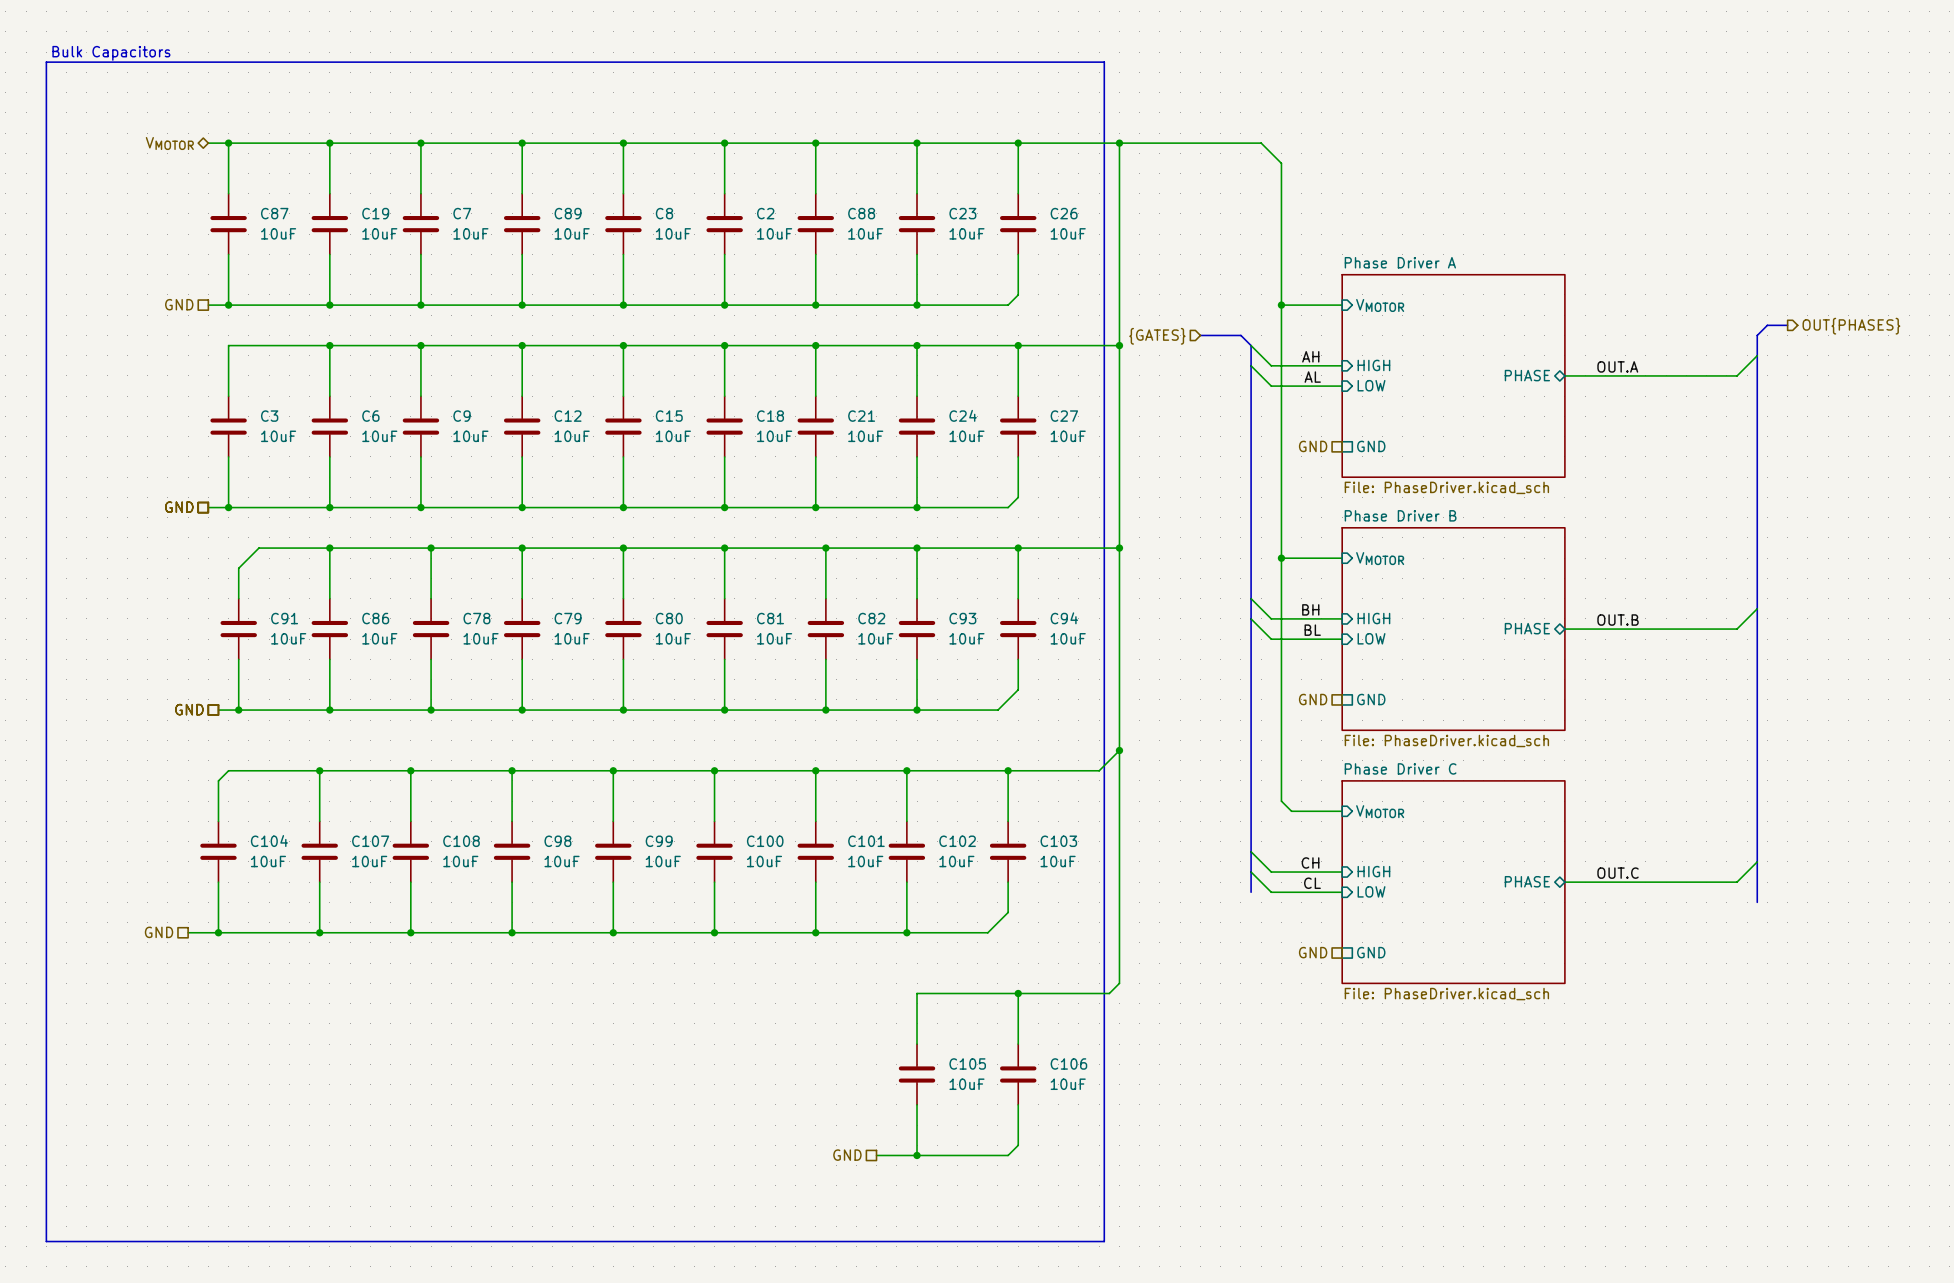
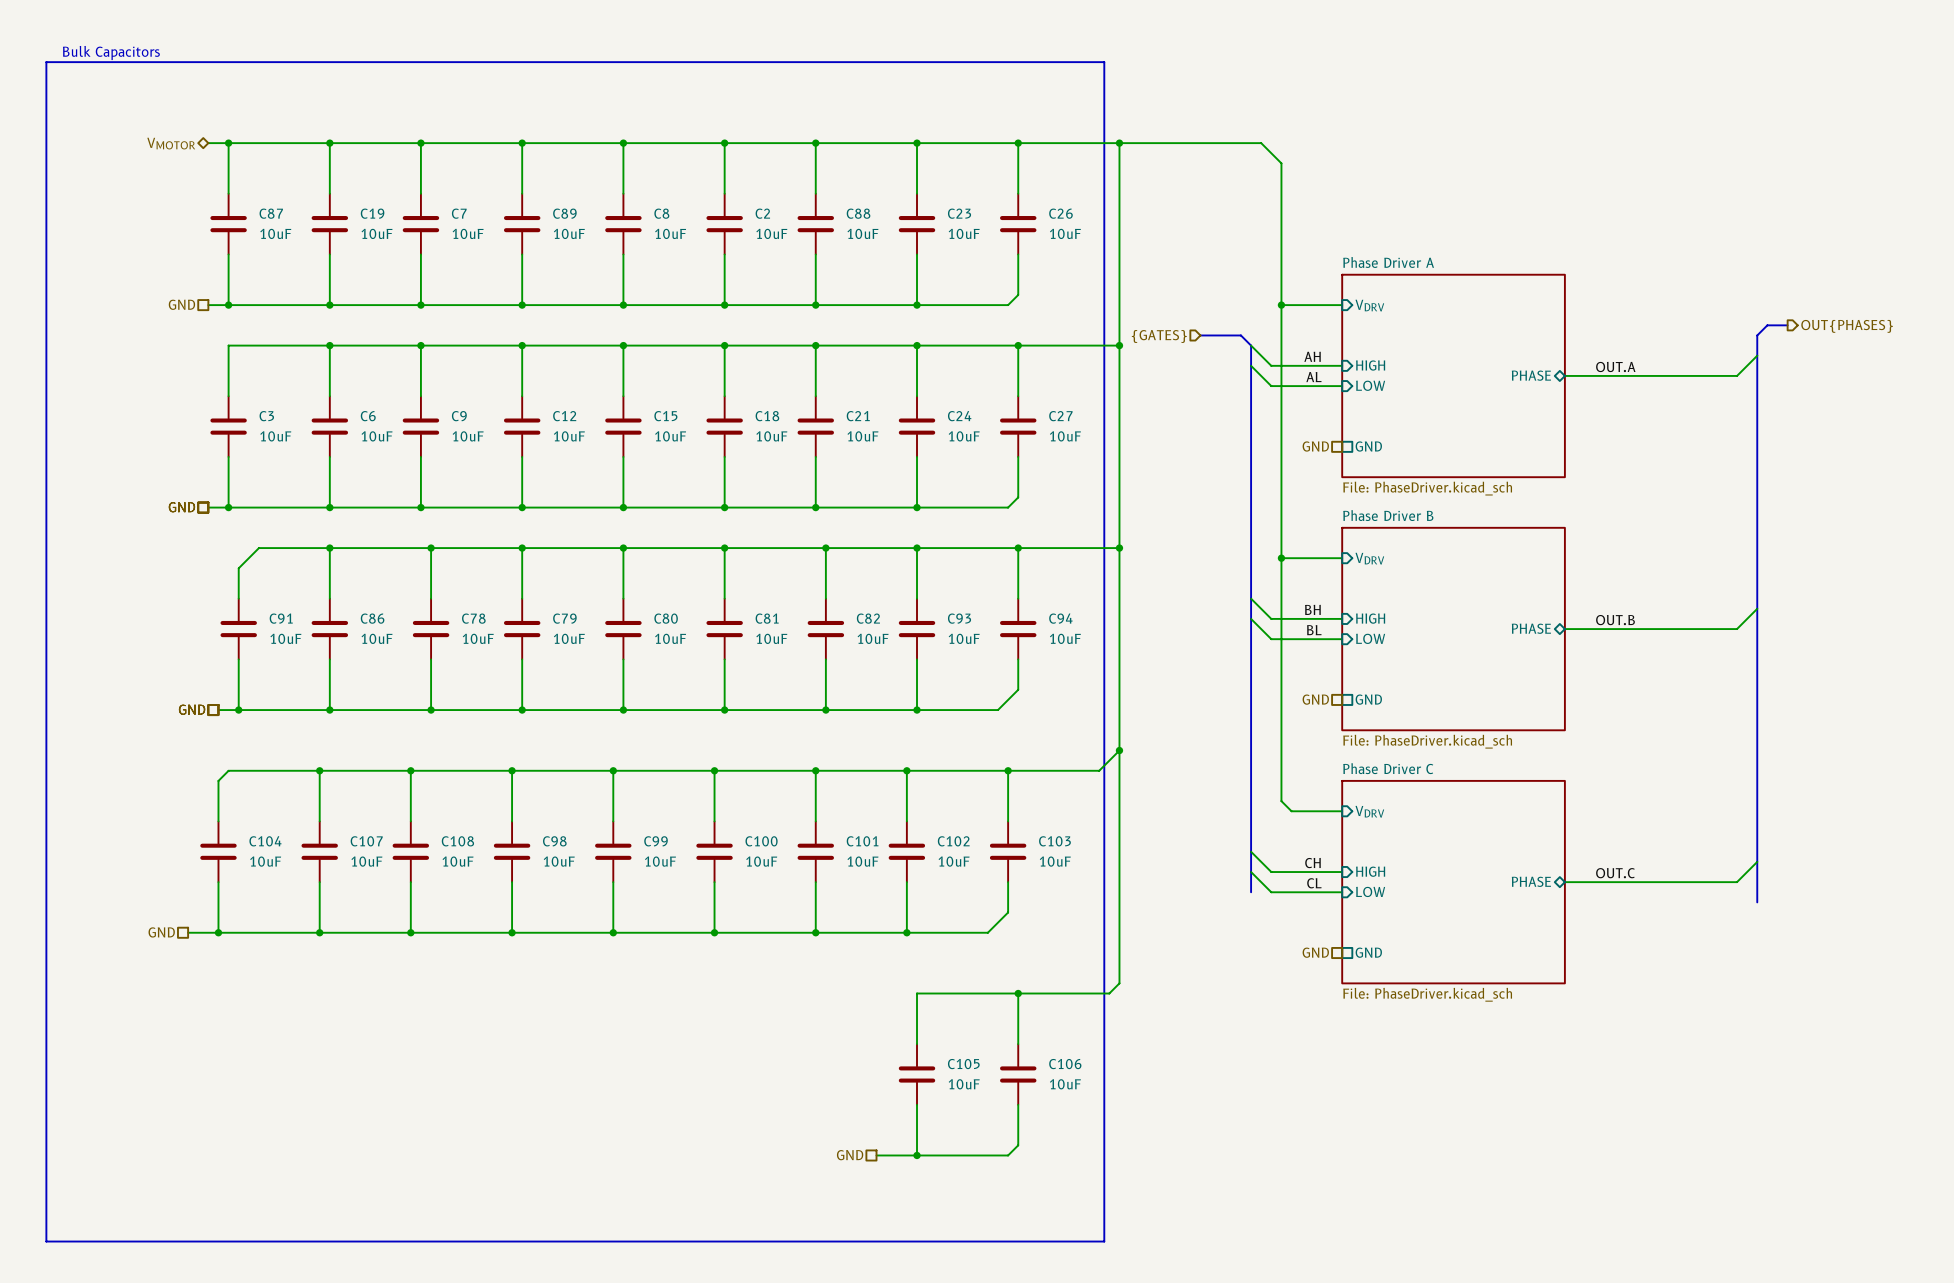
sheet pin: VMOTOR (1380, 305) -> VDRV (1369, 305)
sheet pin: VMOTOR (1380, 558) -> VDRV (1369, 558)
sheet pin: VMOTOR (1380, 811) -> VDRV (1369, 811)

